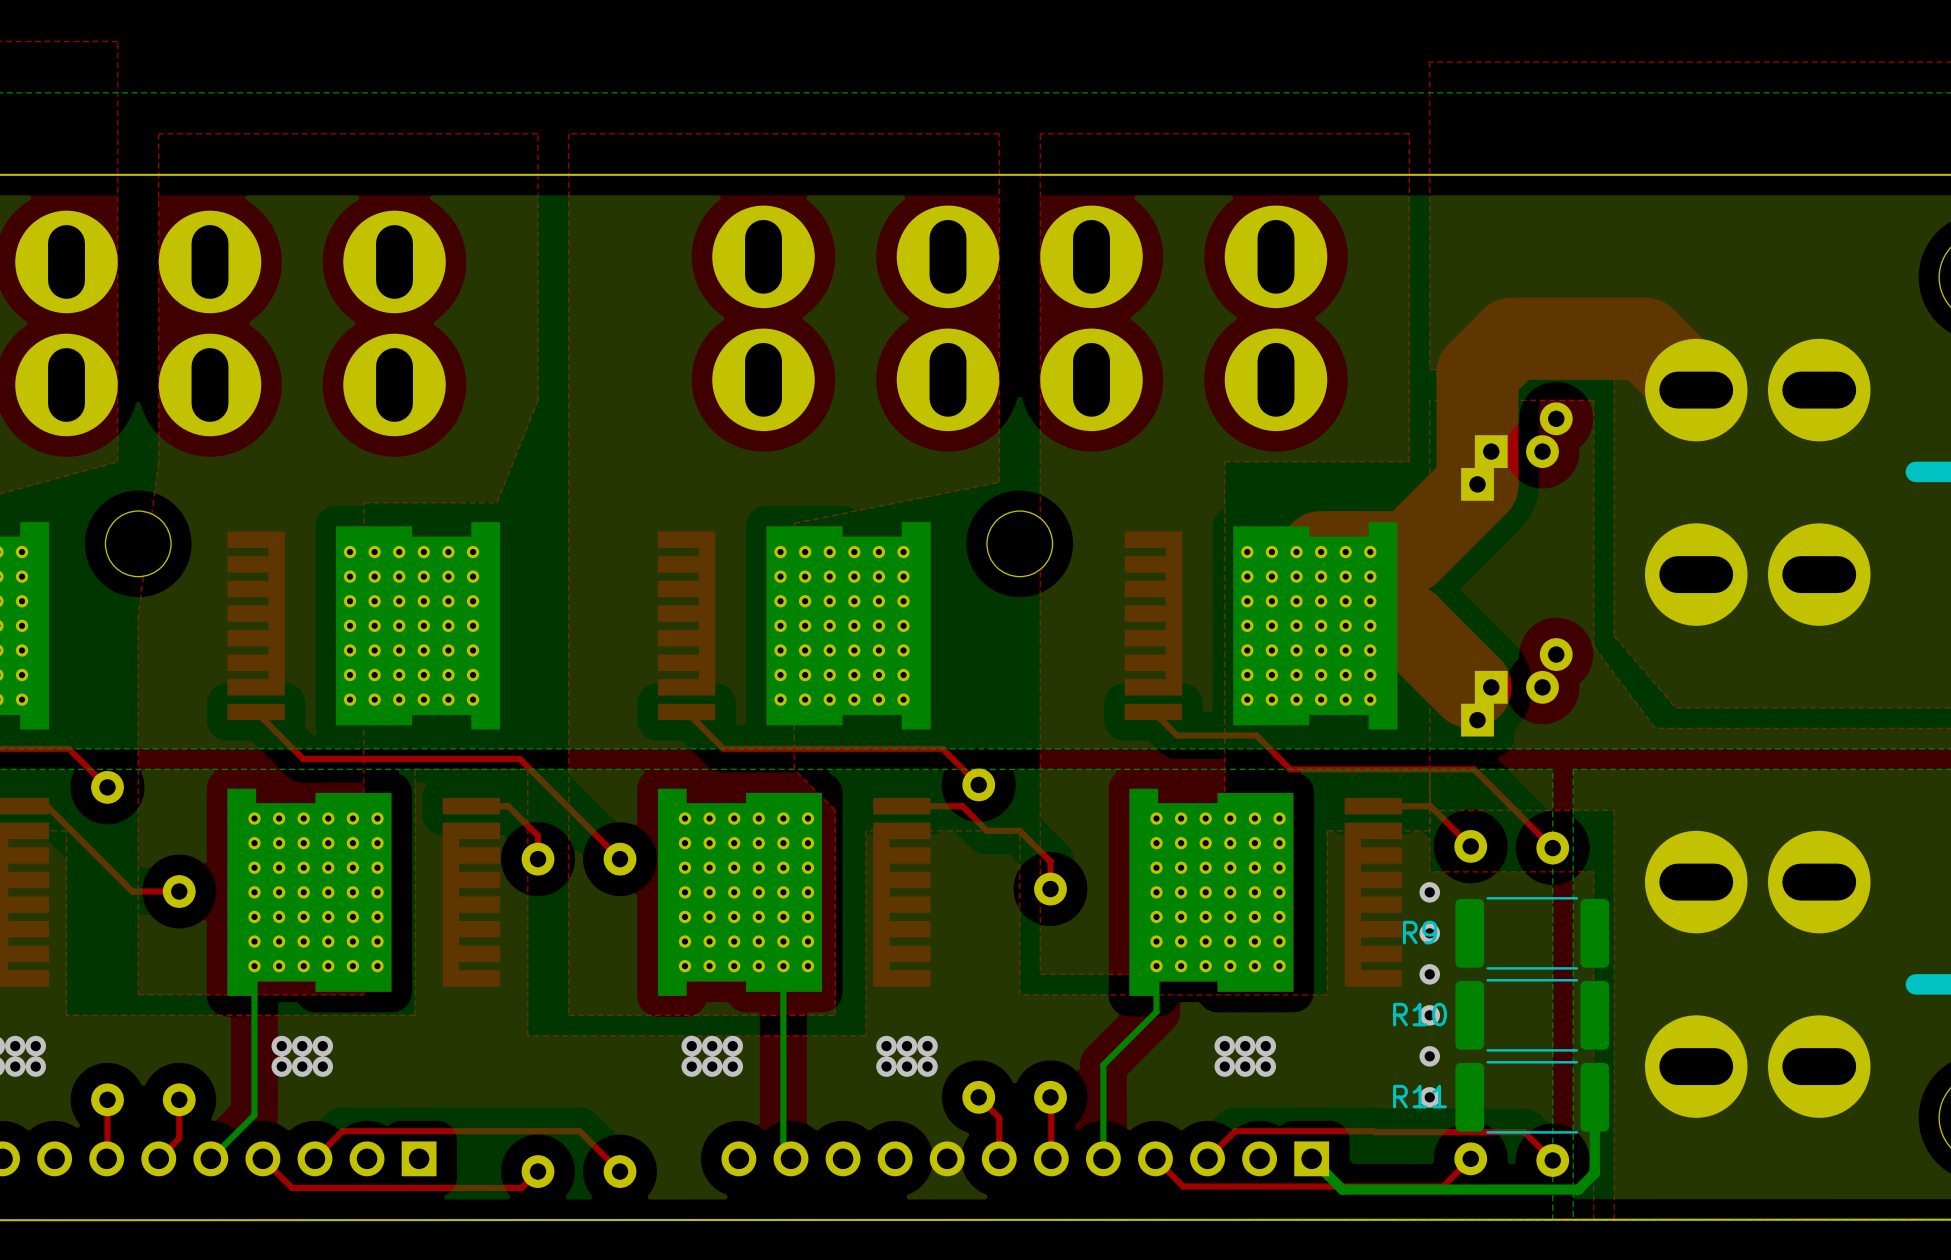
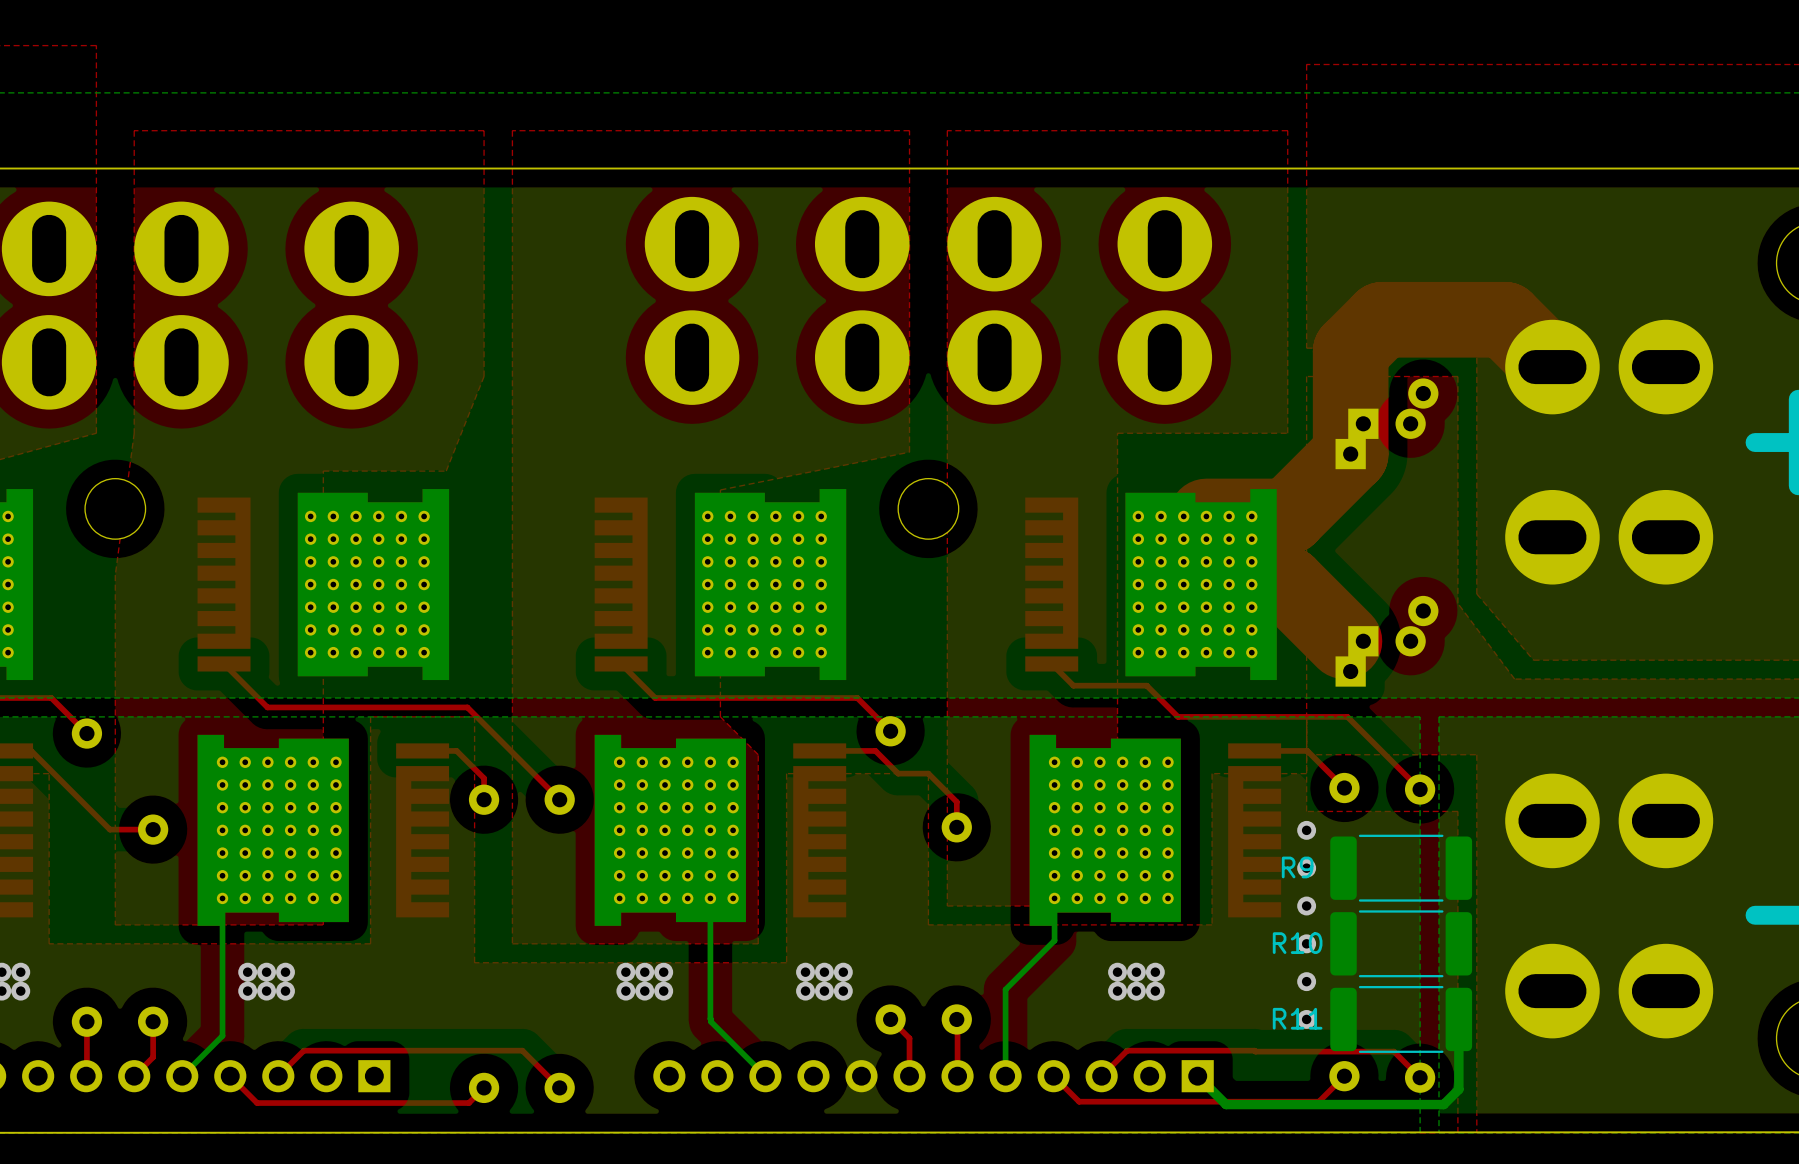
bottom track: (783, 1096) (783, 1151) (790, 1158) -> (710, 1018) (710, 1021) (765, 1076)

